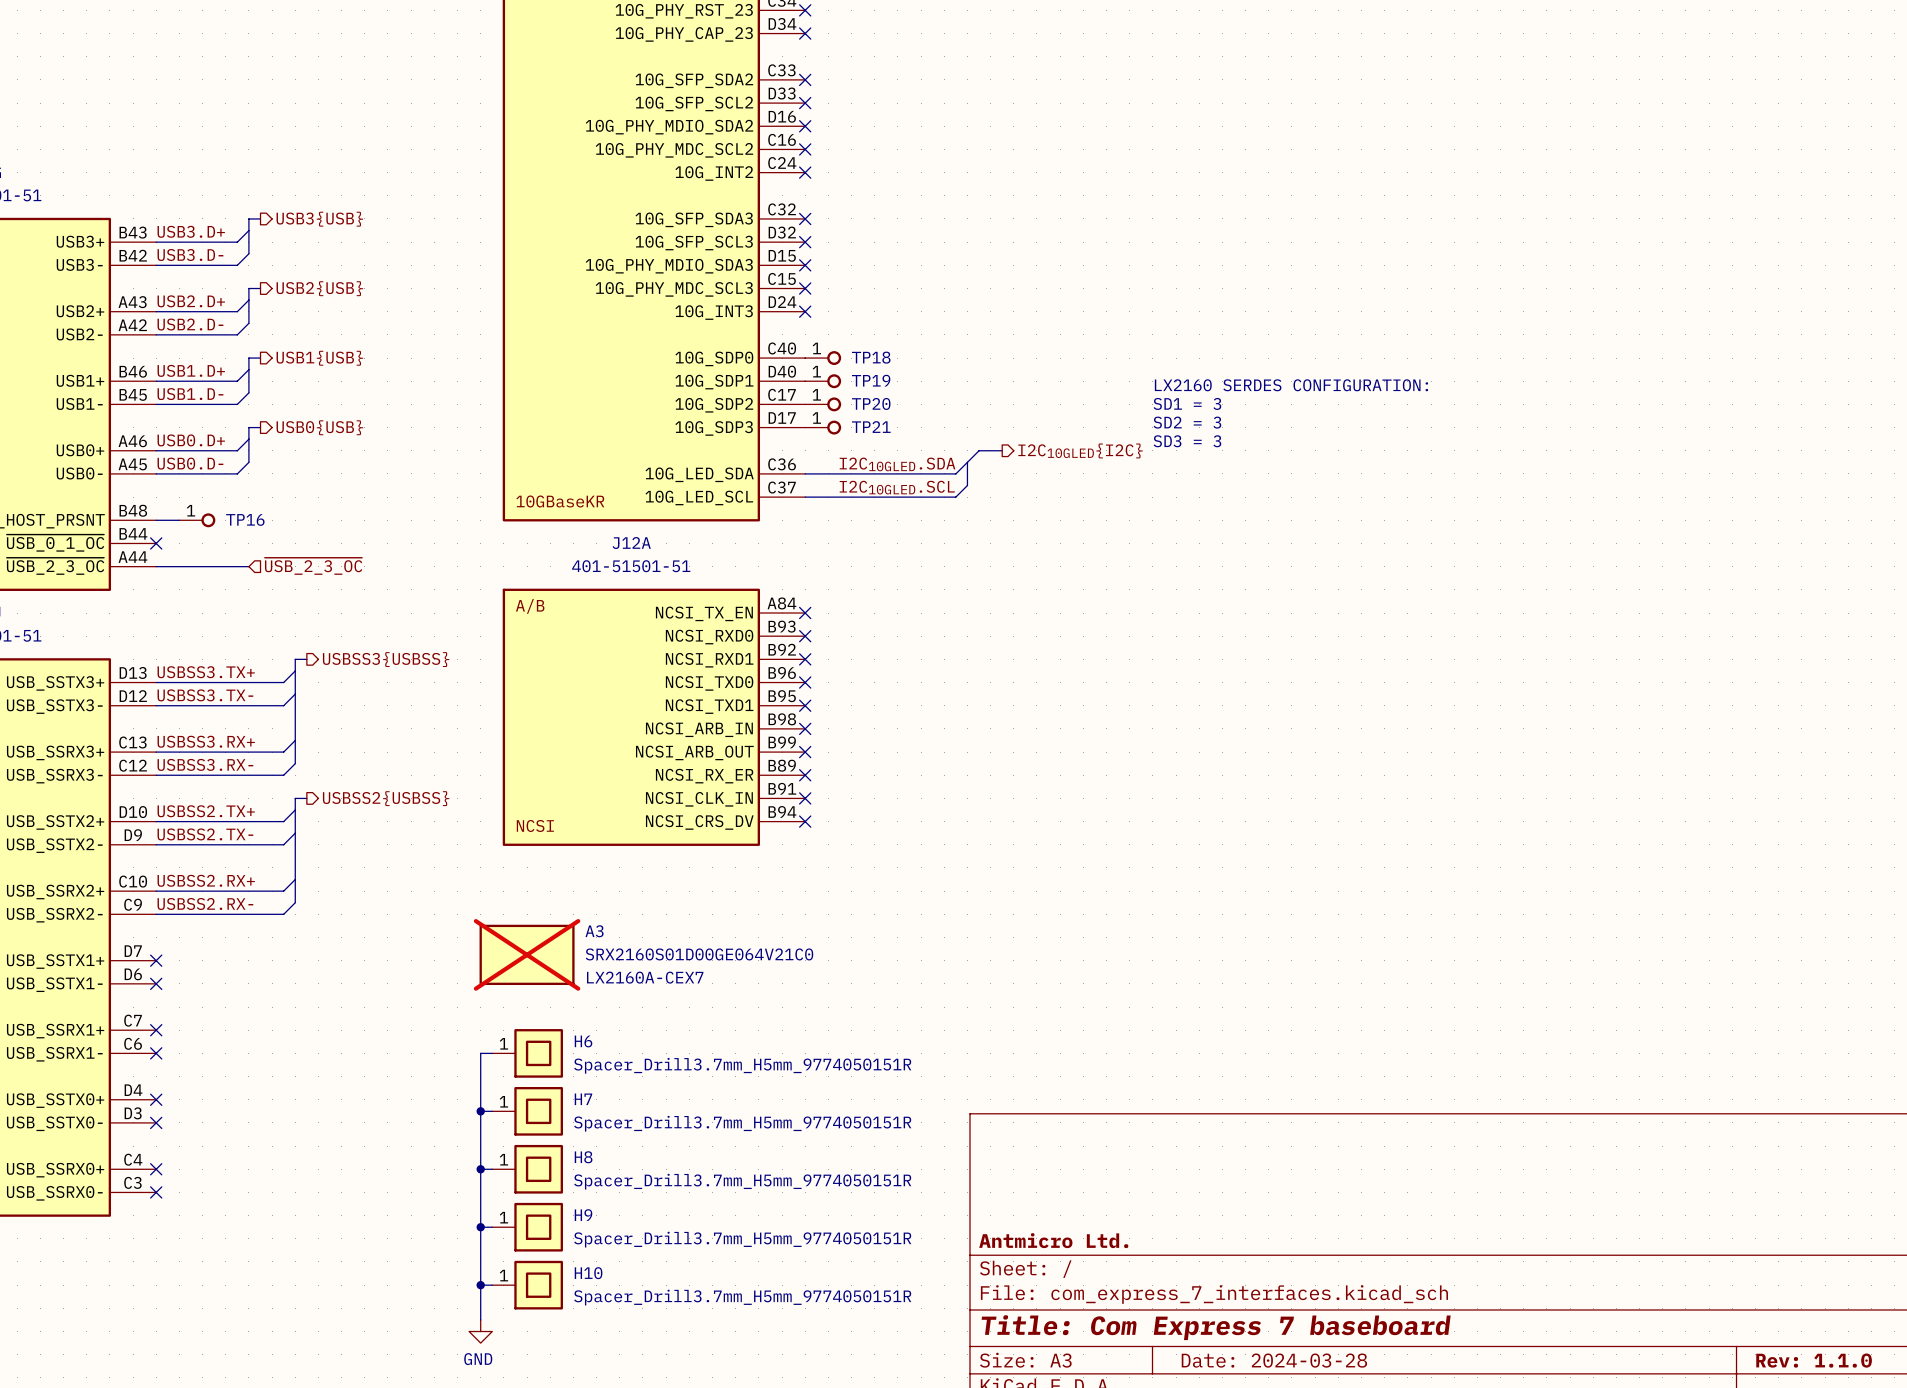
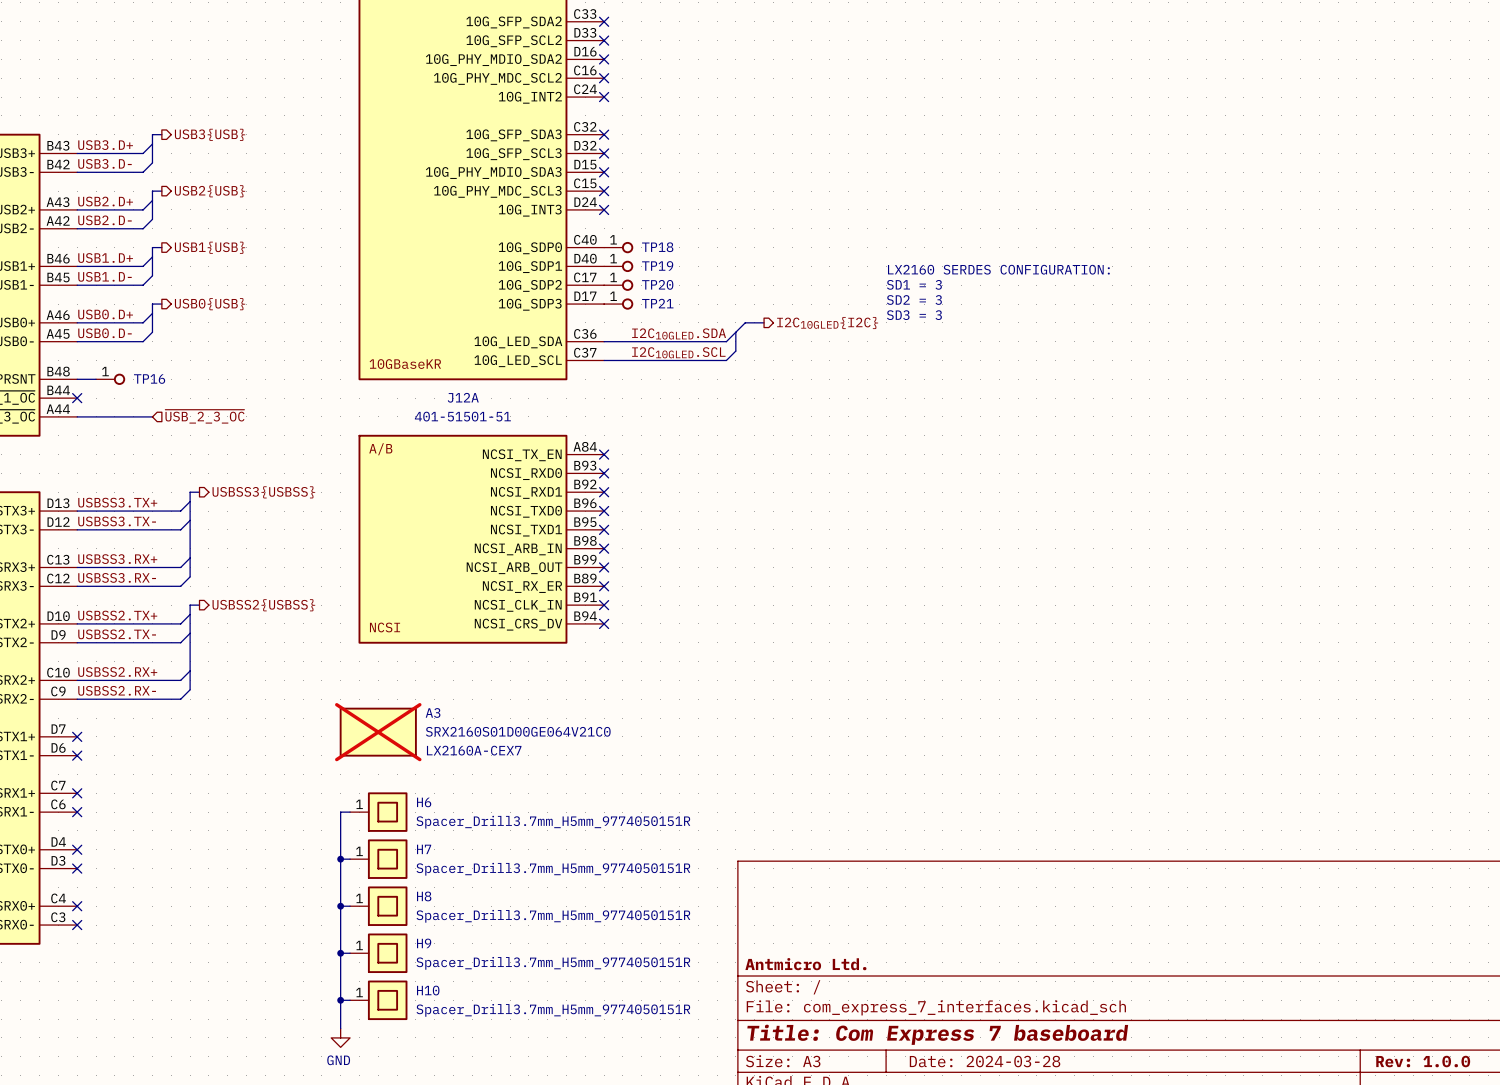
title block: Rev: 1.1.0 (1814, 1360) -> Rev: 1.0.0 (1423, 1061)

